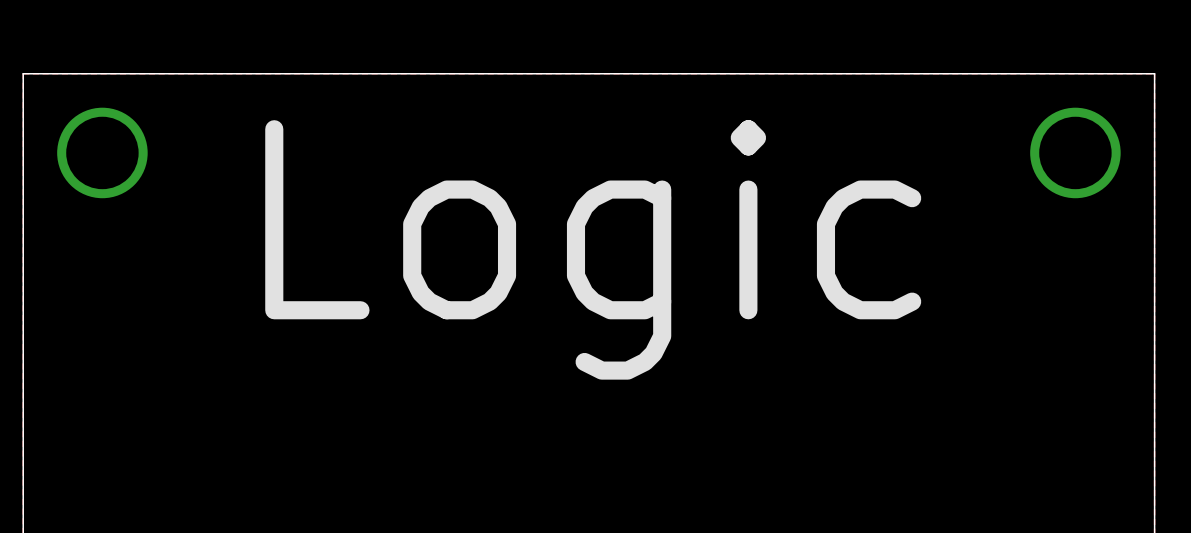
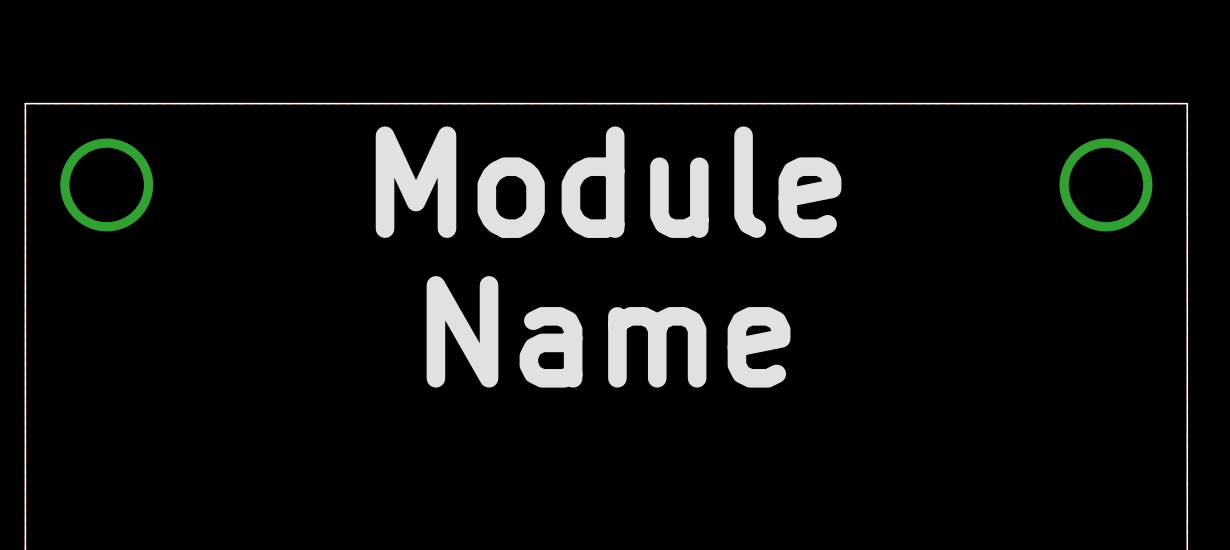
text: none -> Module (608, 182)
text: Logic (593, 249) -> none
text: none -> Name (608, 331)

